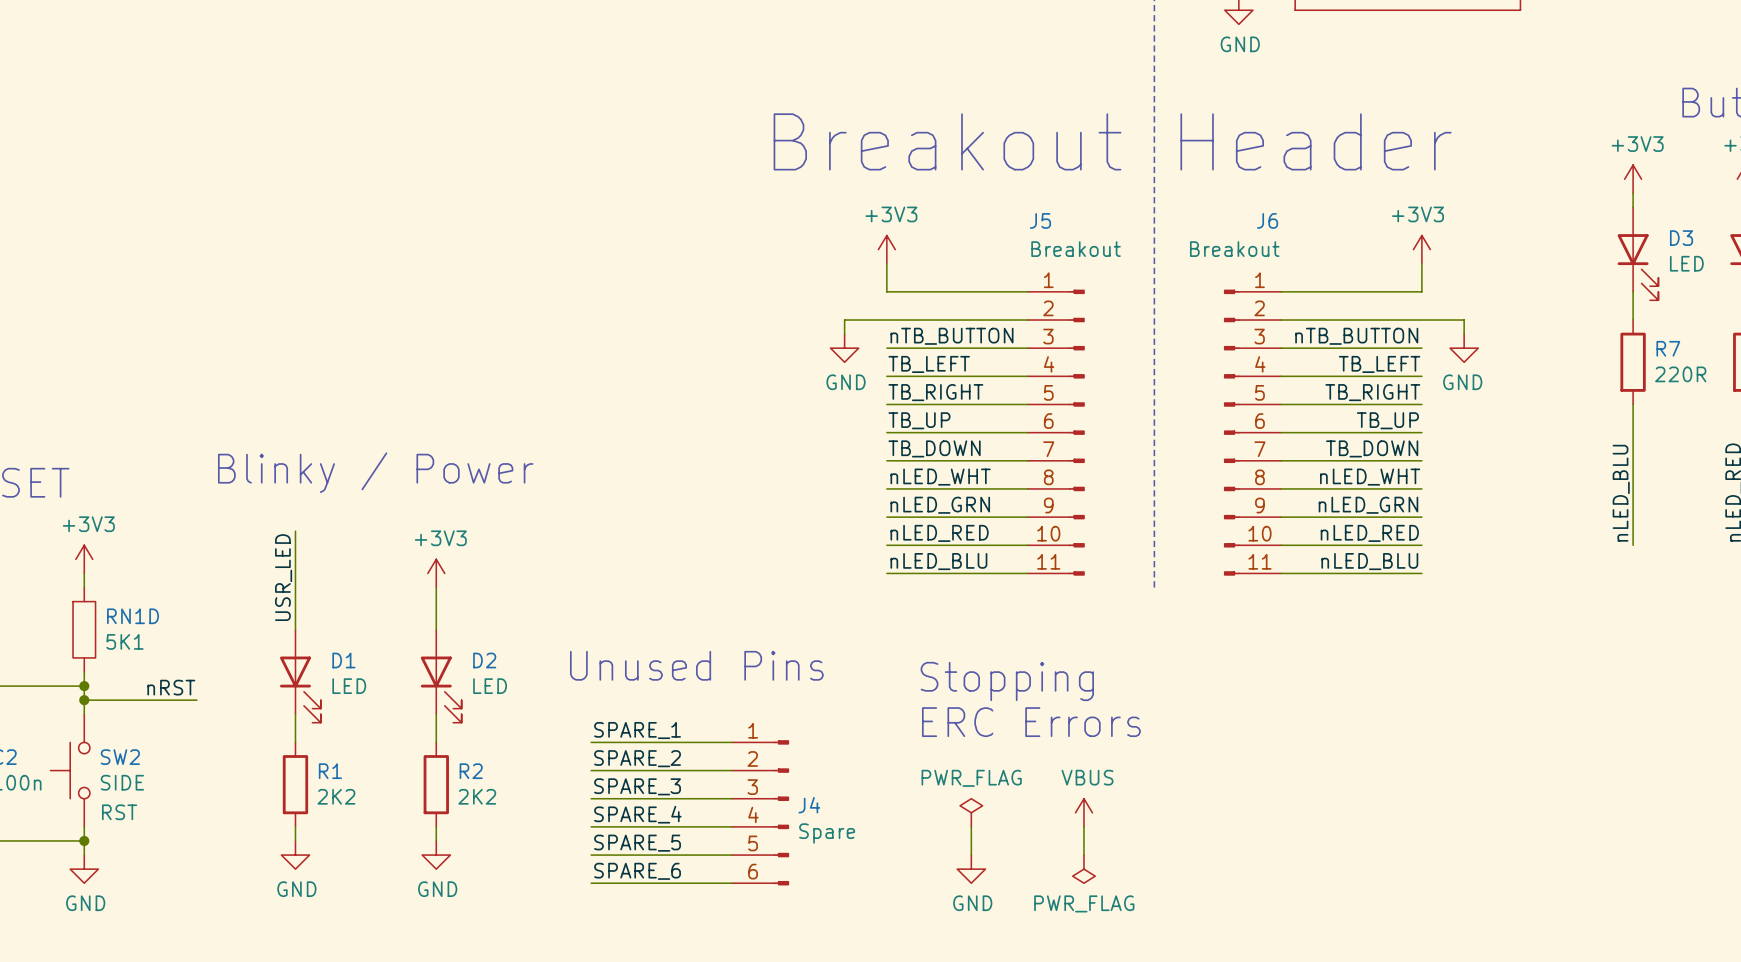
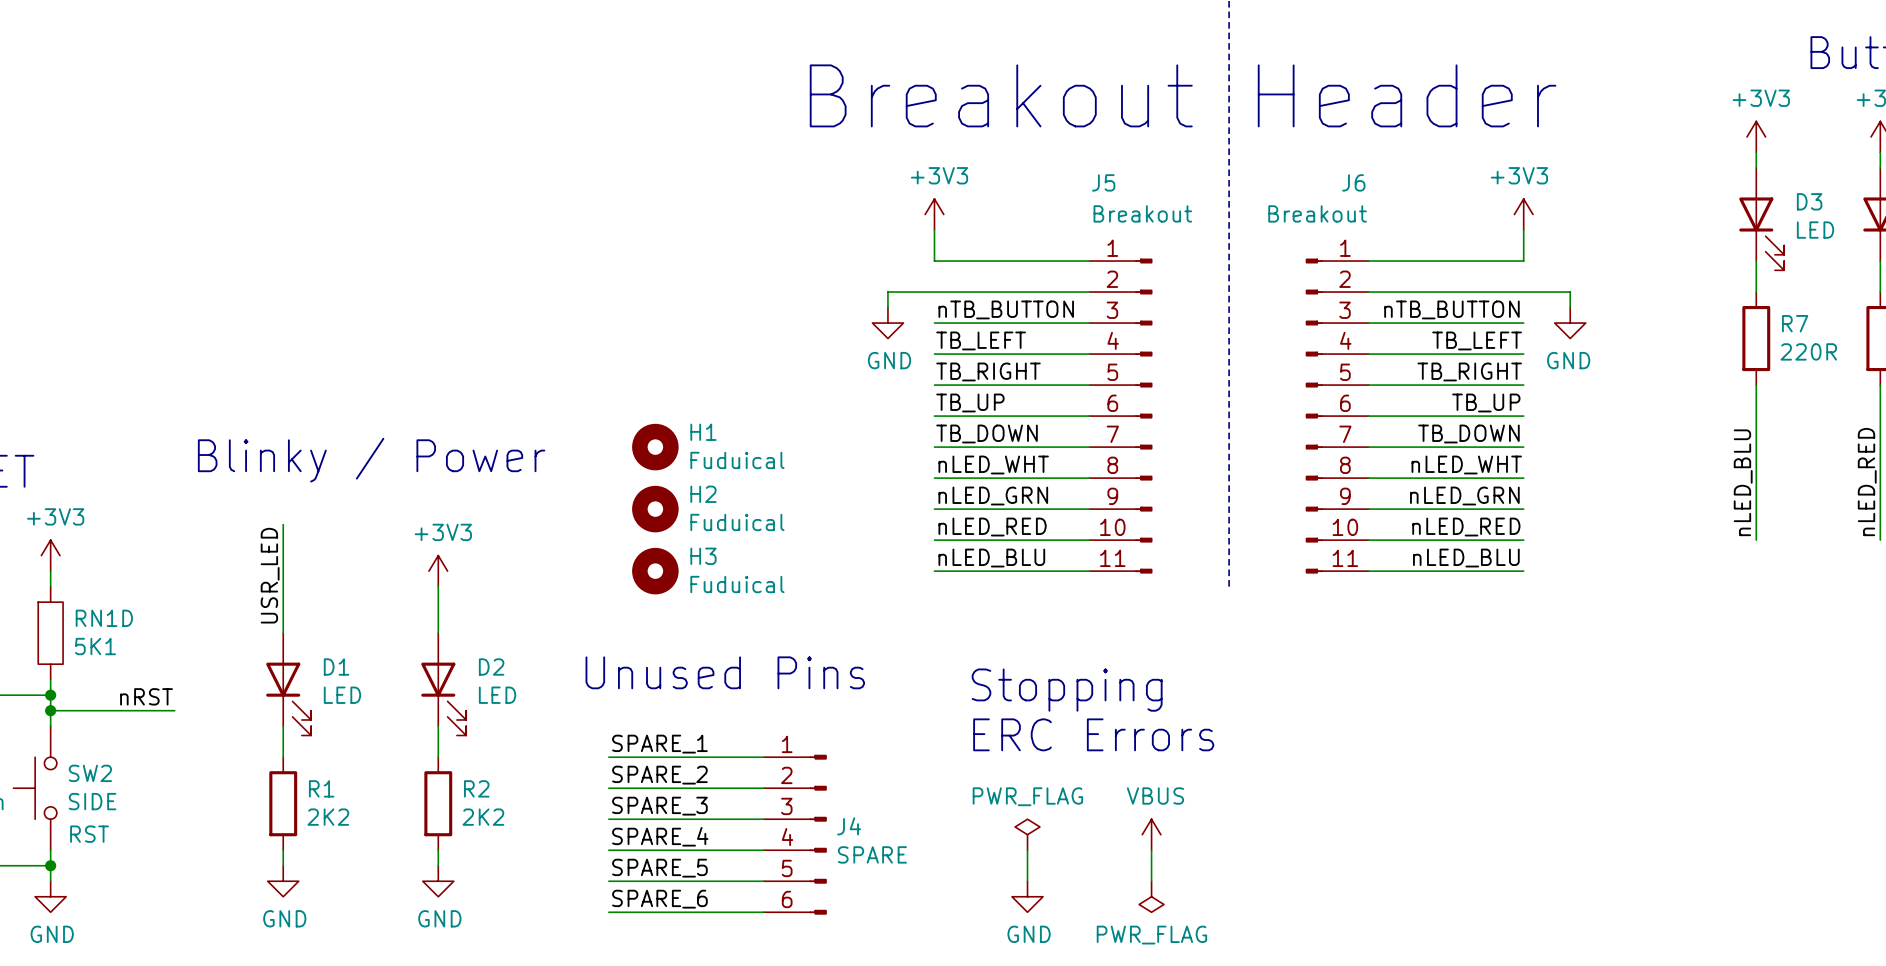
H1: none -> Fuduical (655, 447)
H2: none -> Fuduical (655, 509)
H3: none -> Fuduical (655, 571)
J4 value: Spare (827, 833) -> SPARE (872, 854)

